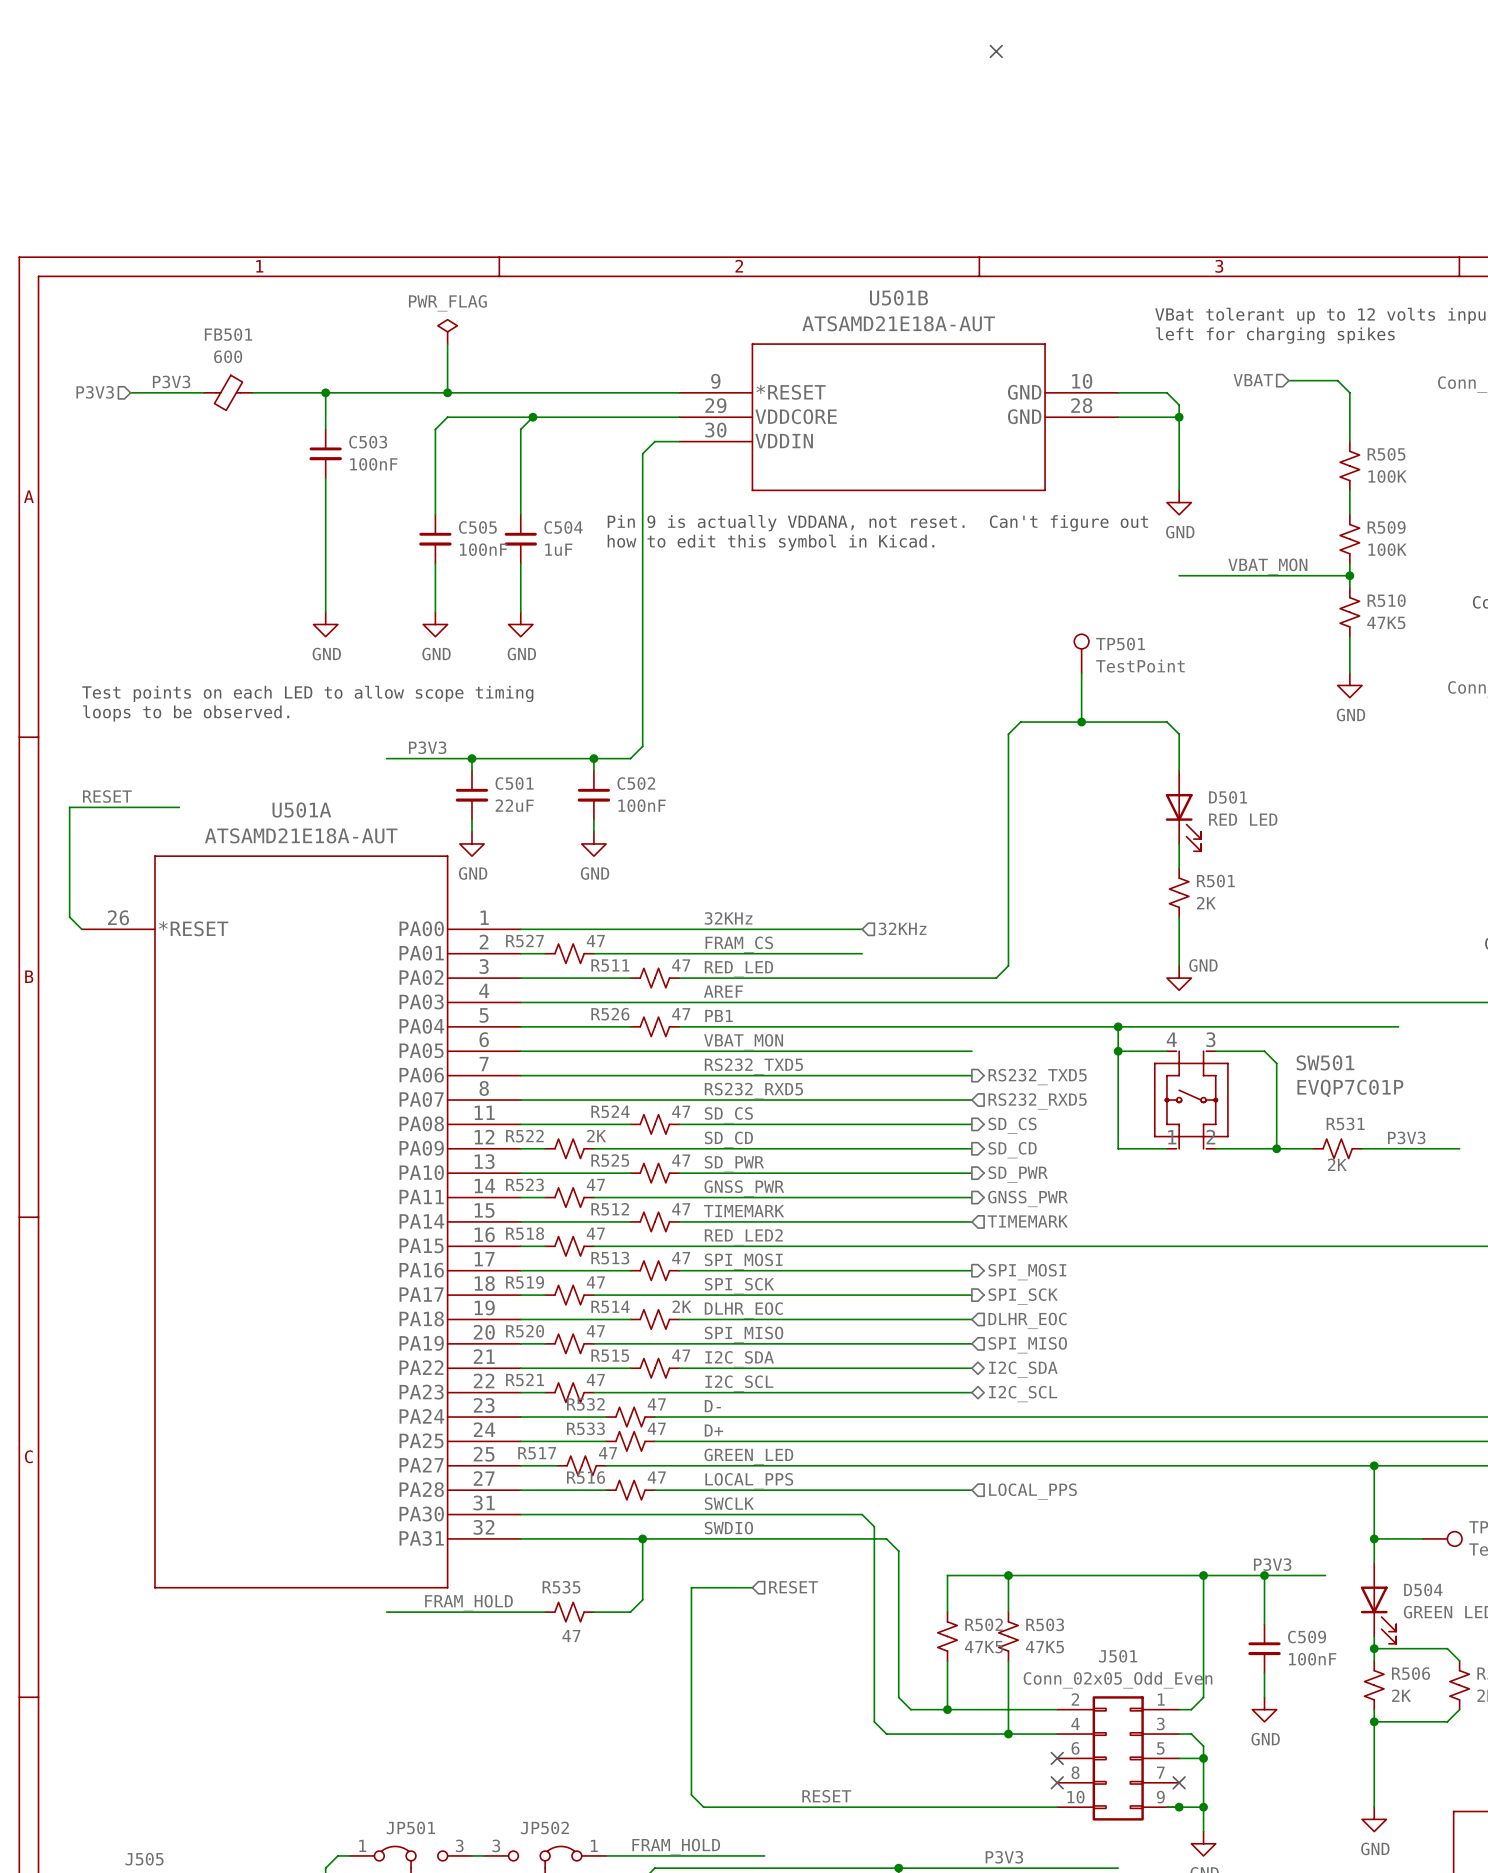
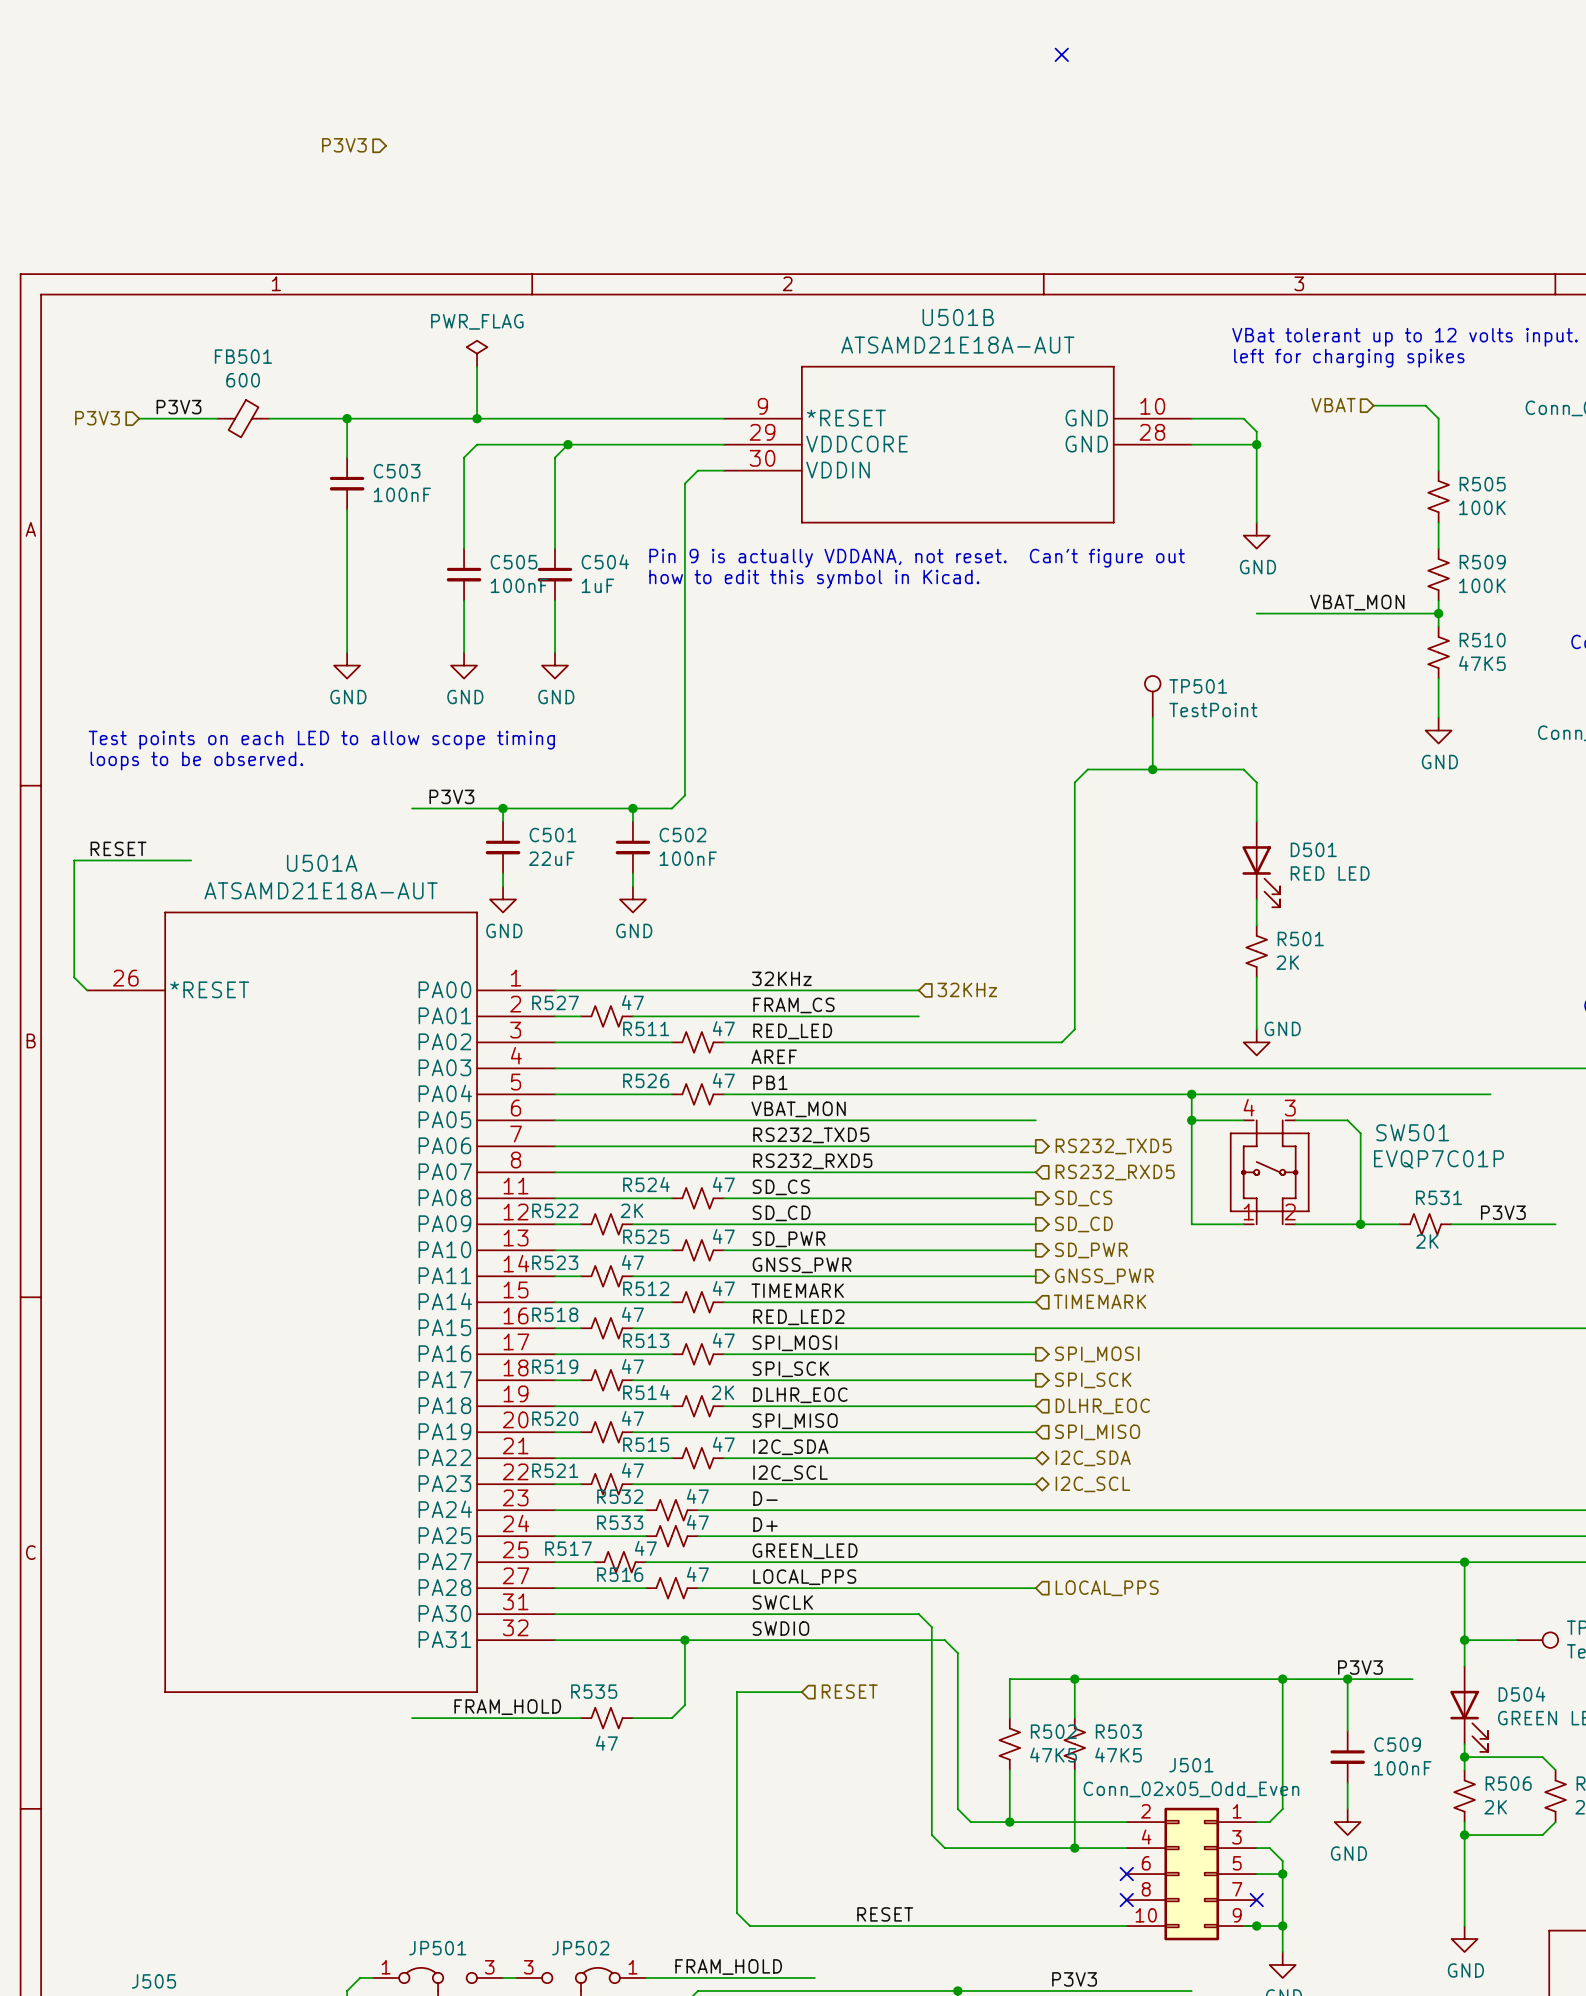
hierarchical label: none -> P3V3 (344, 145)

